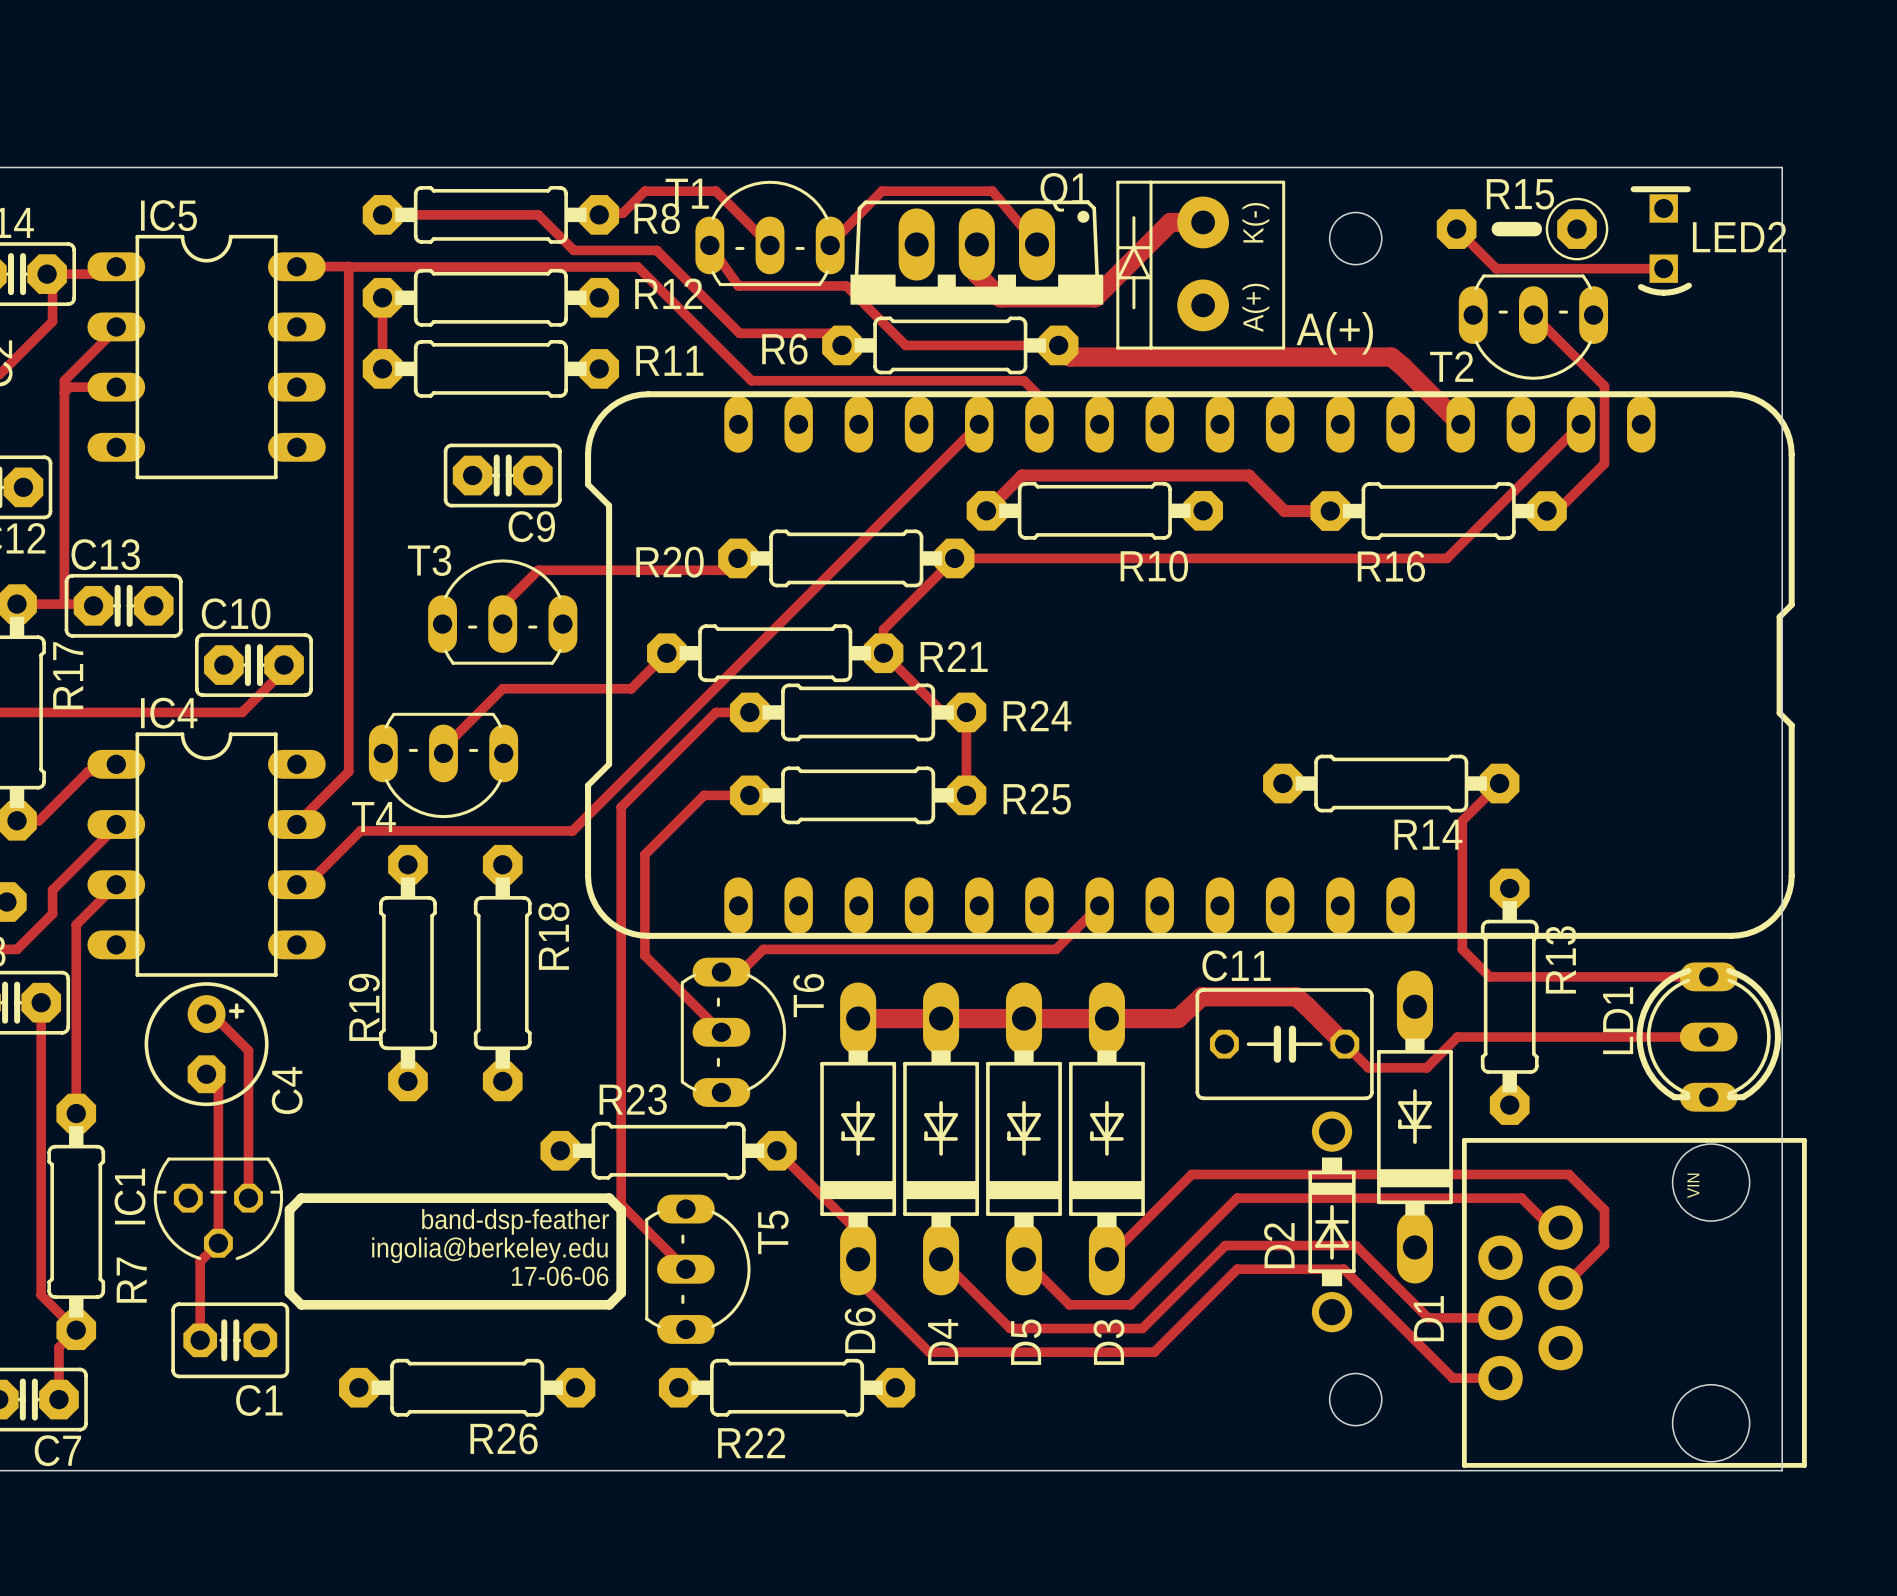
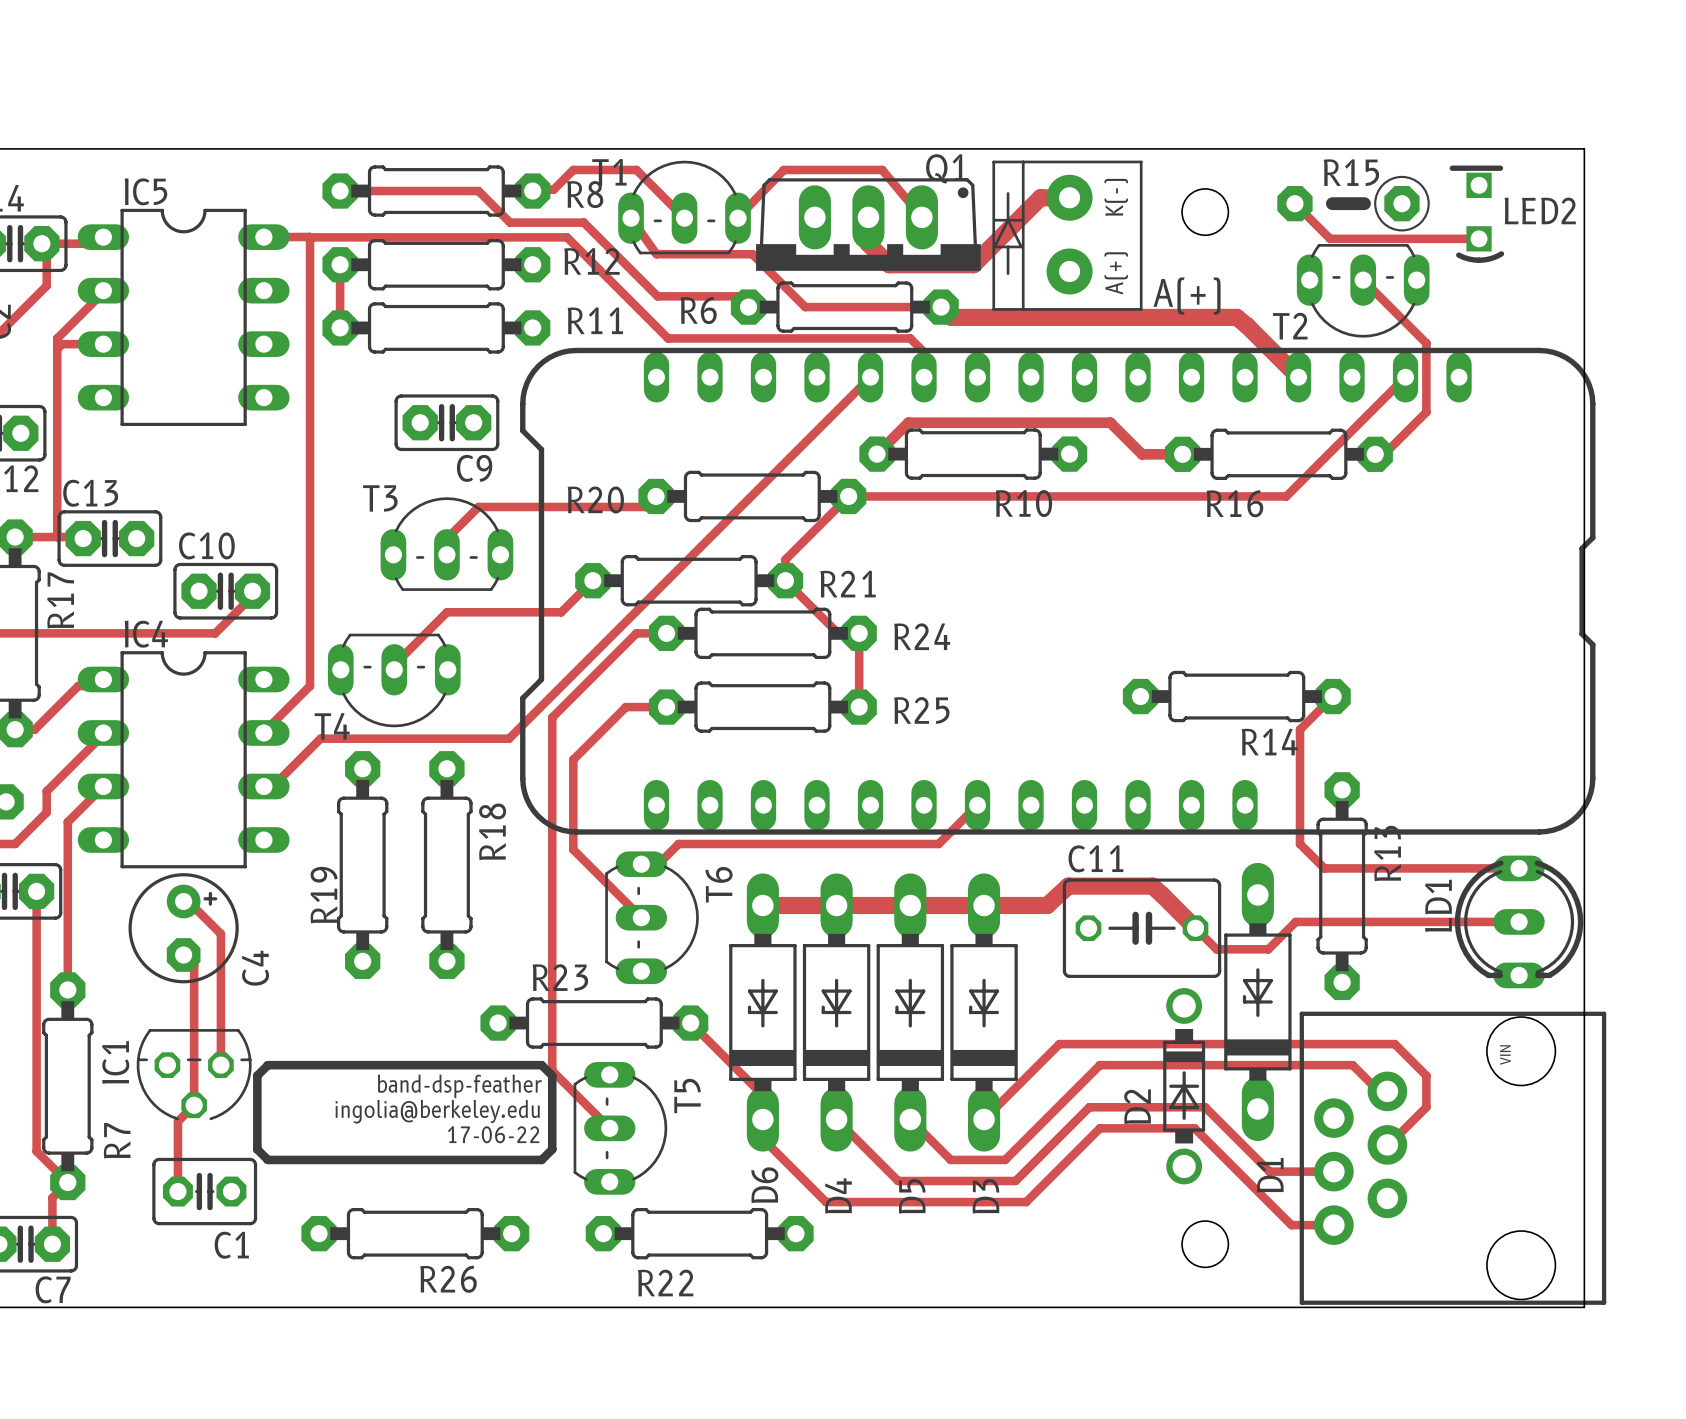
text: 17-06-06 (560, 1276) -> 17-06-22 (493, 1134)

